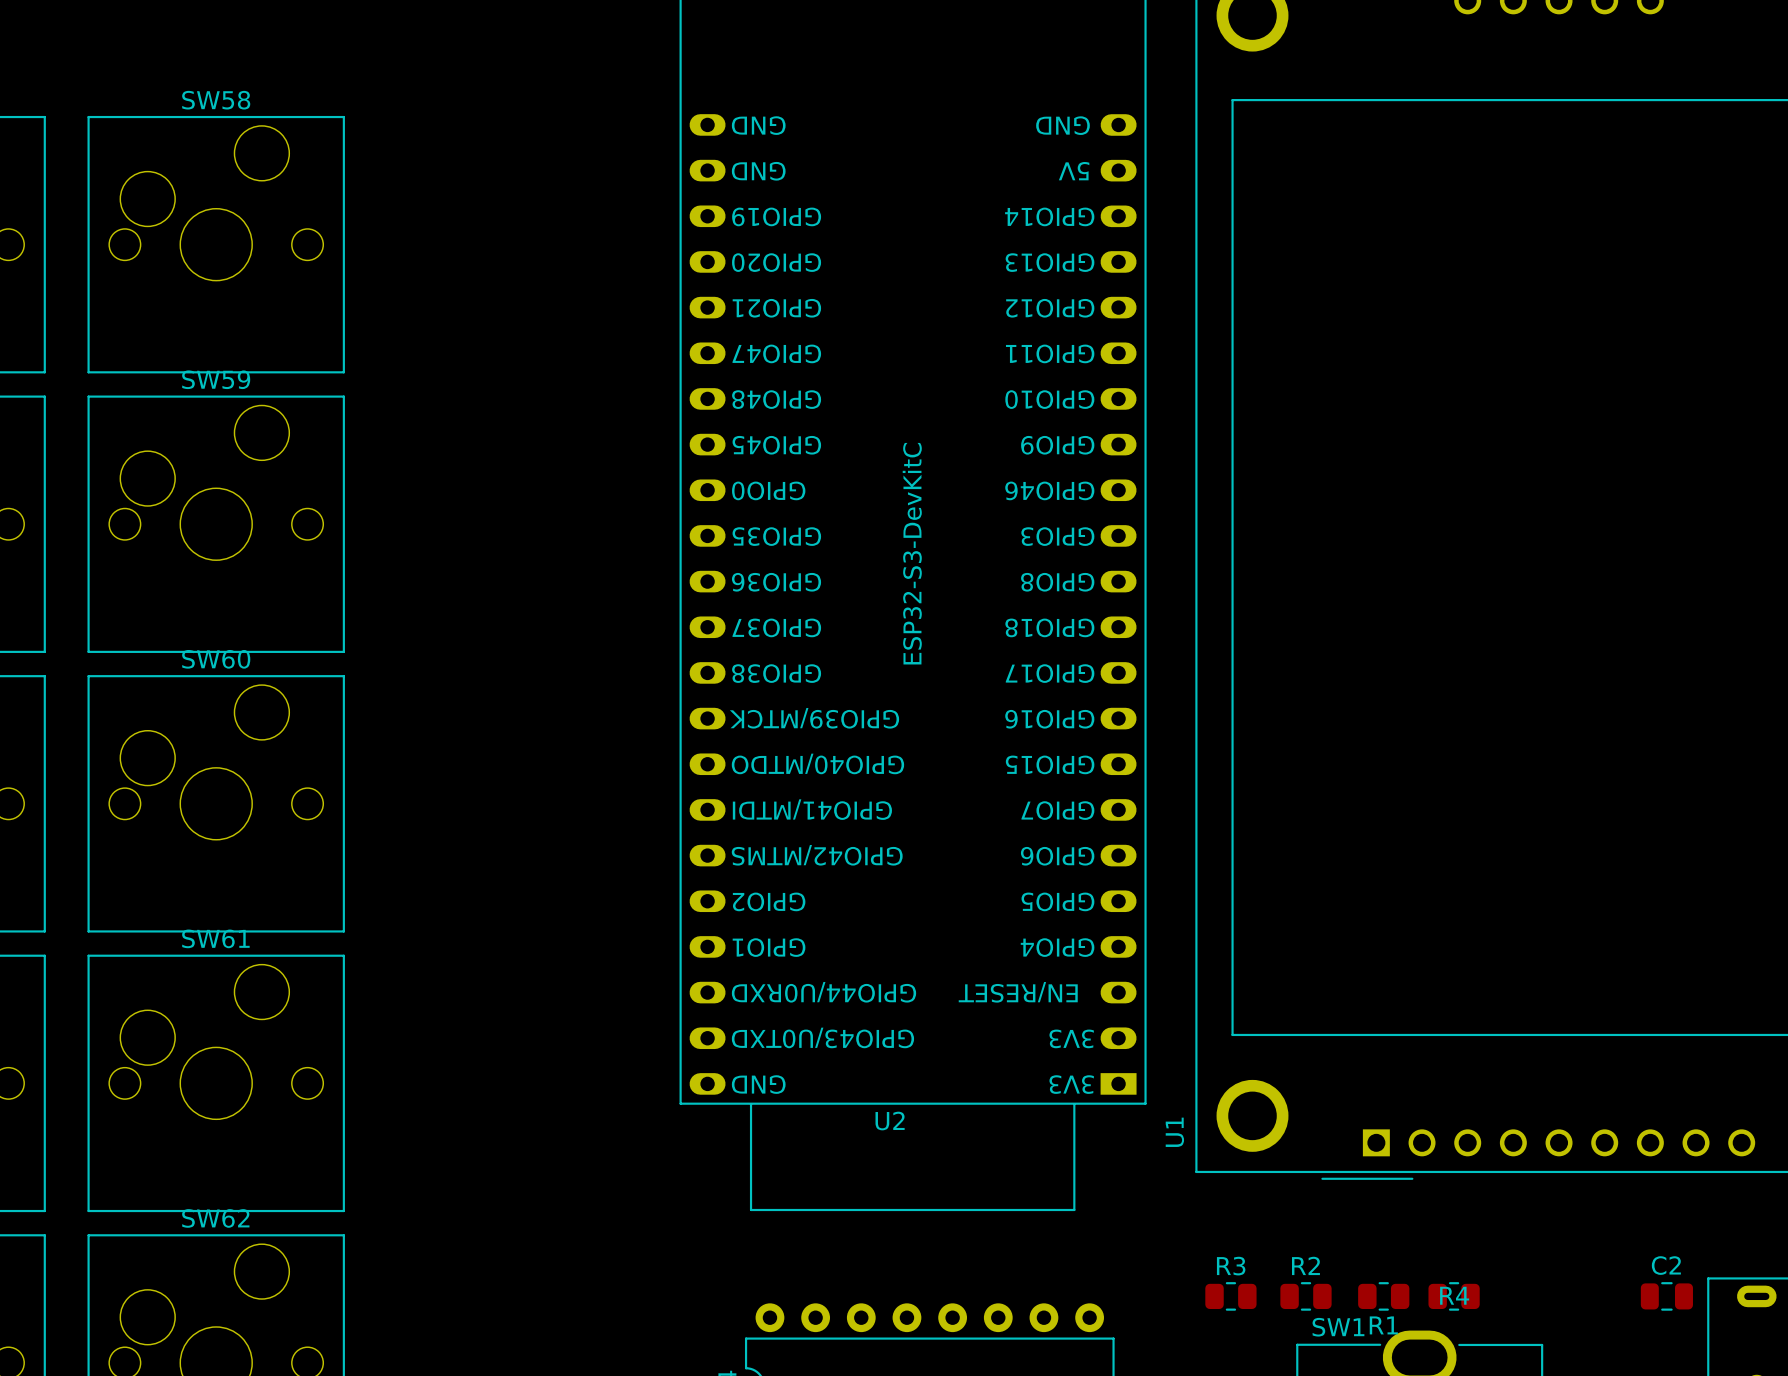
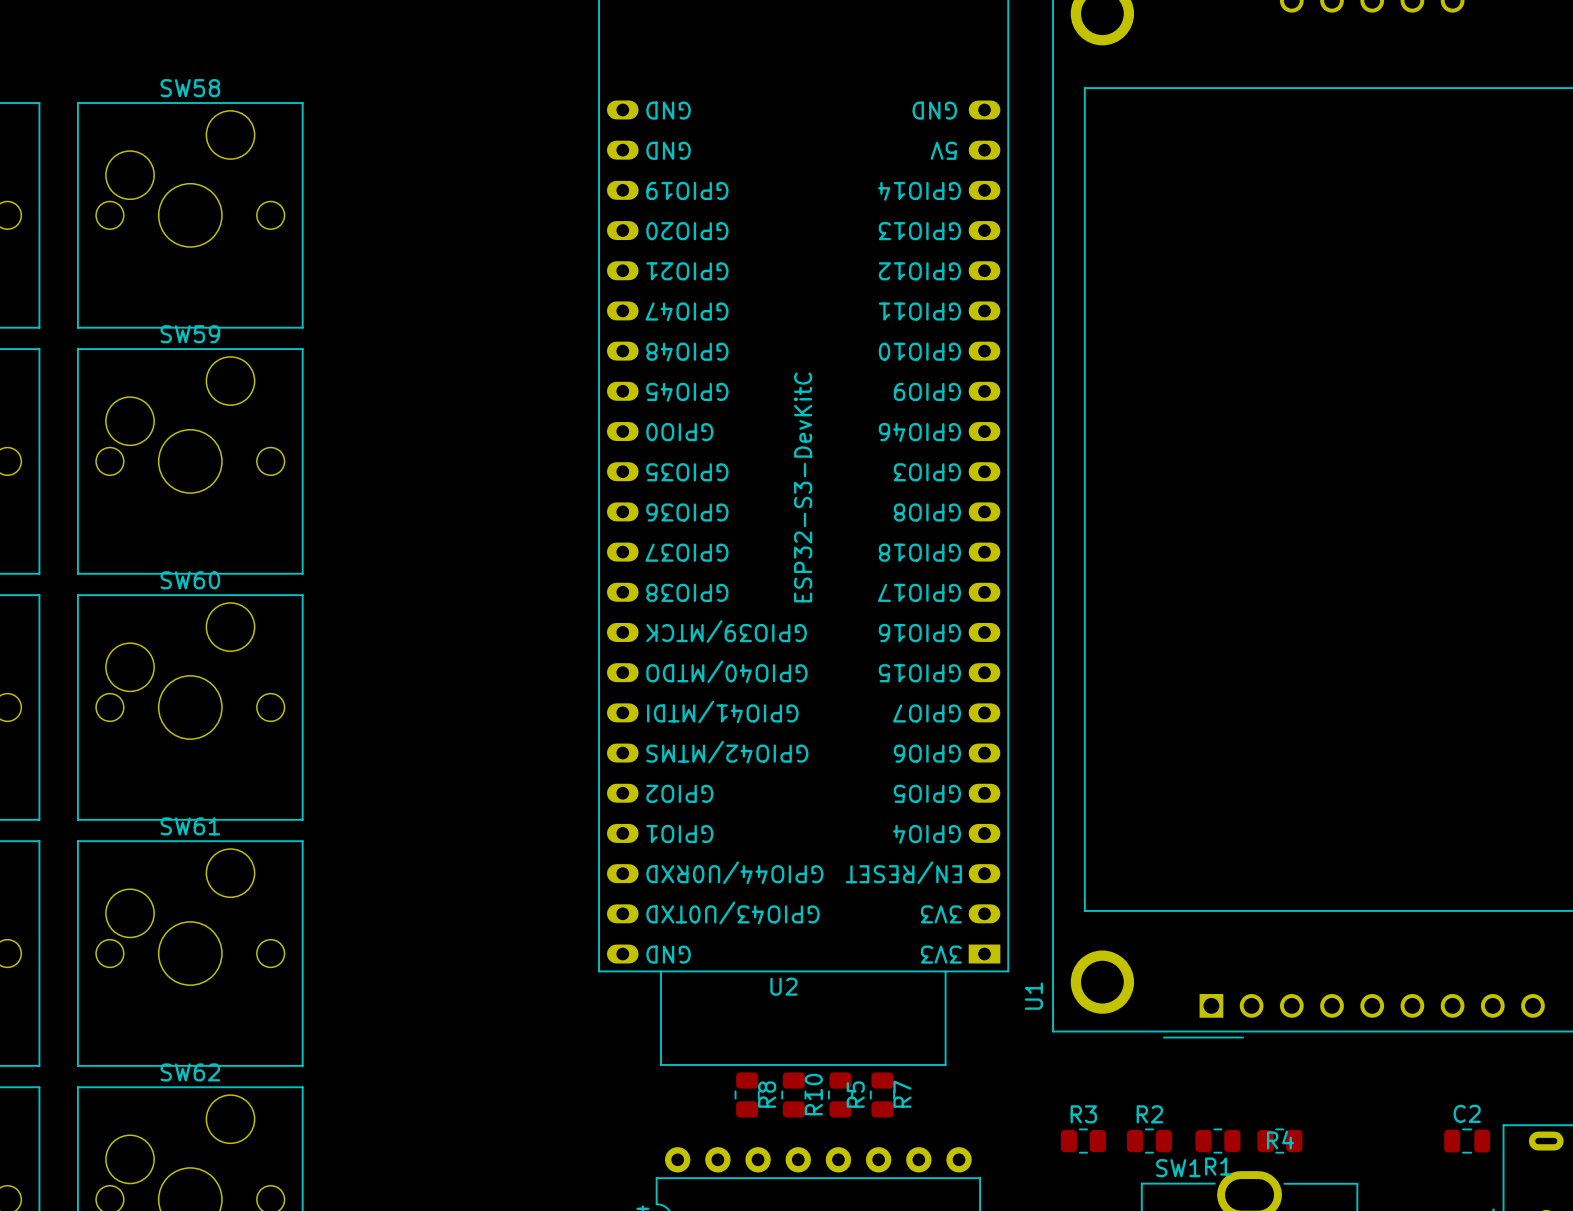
R7: none -> (747, 1094)
R8: none -> (793, 1094)
R10: none -> (840, 1094)
R5: none -> (882, 1094)

